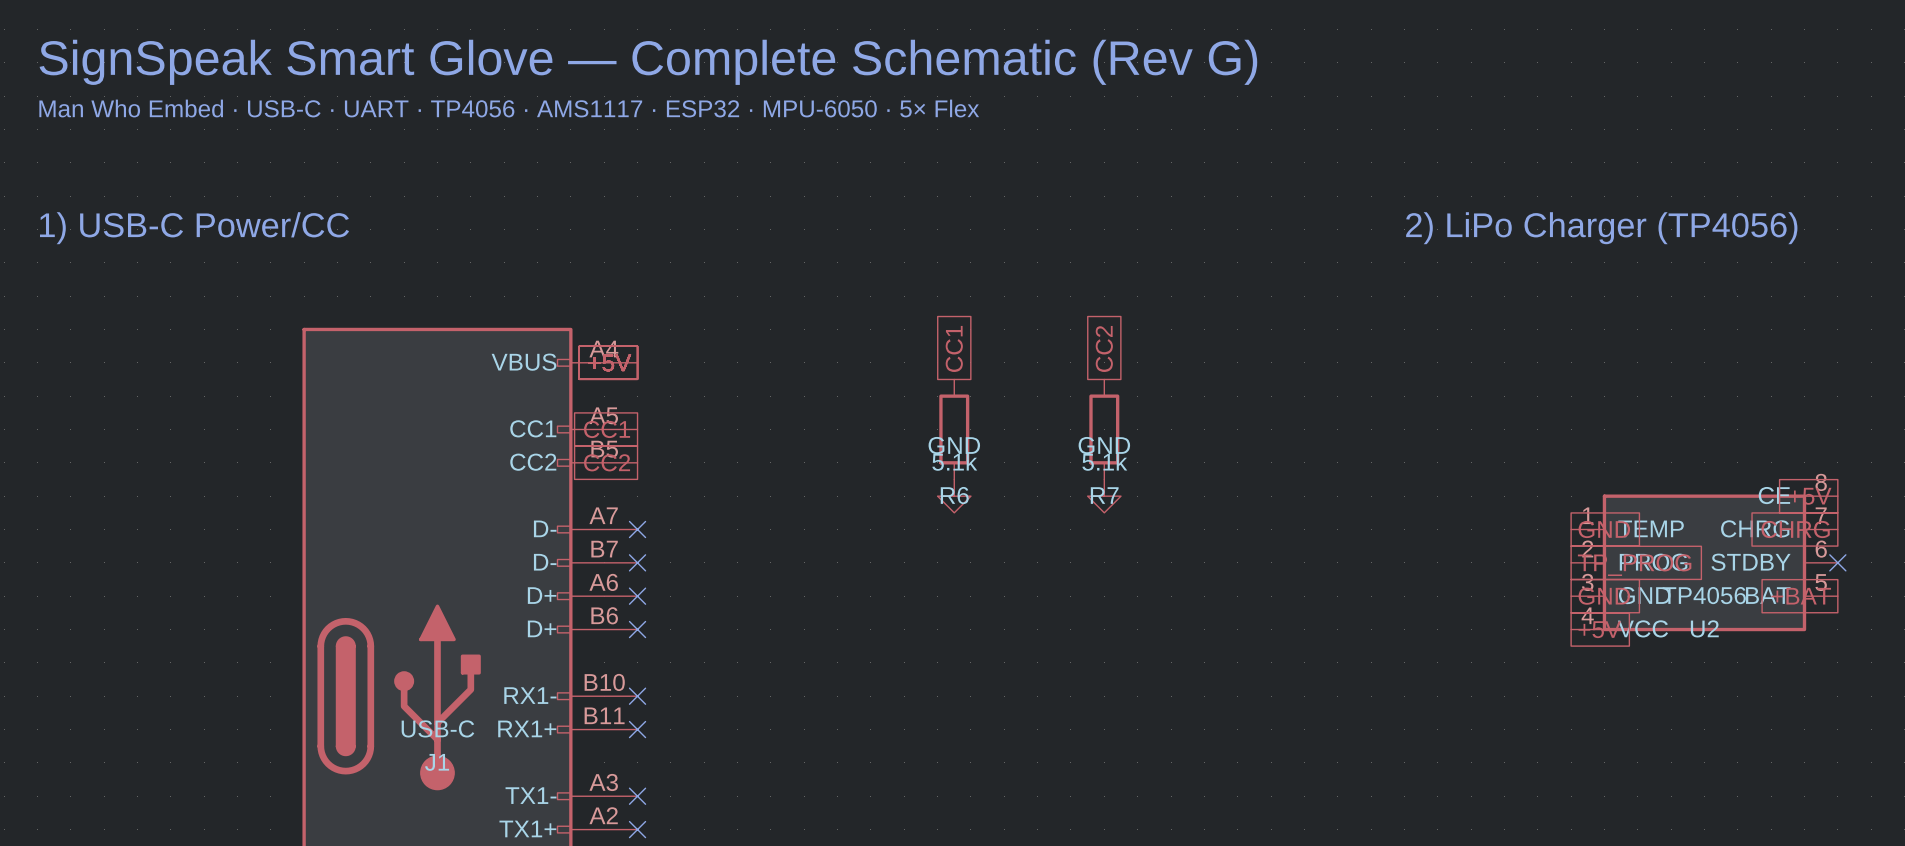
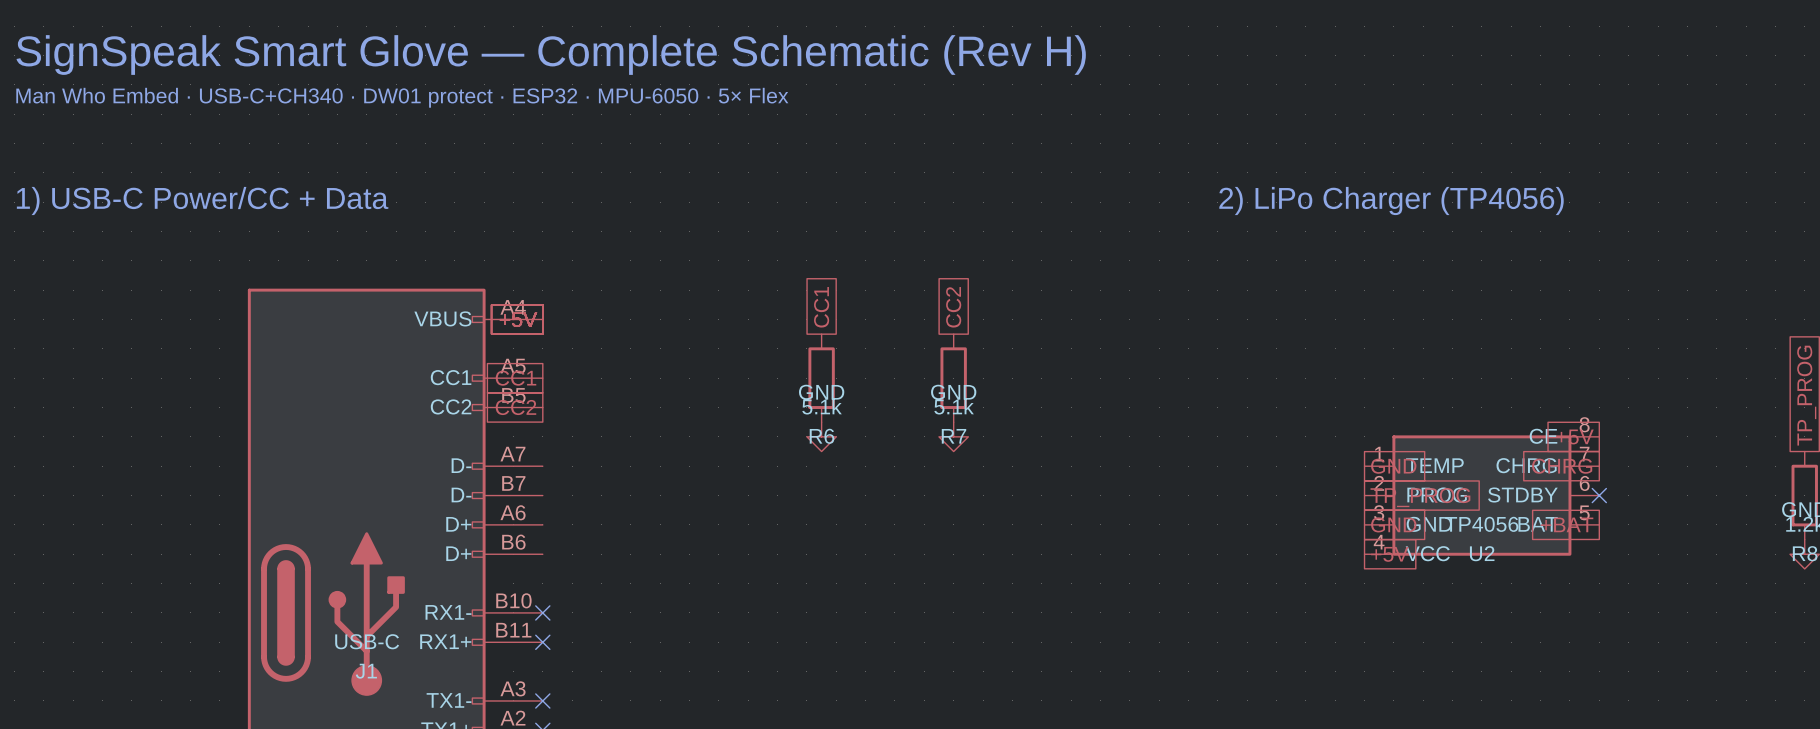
text: SignSpeak Smart Glove — Complete Schematic (Rev G) (648, 62) -> SignSpeak Smart Glove — Complete Schematic (Rev H) (551, 55)
text: Man Who Embed · USB-C · UART · TP4056 · AMS1117 · ESP32 · MPU-6050 · 5× Flex (509, 108) -> Man Who Embed · USB-C+CH340 · DW01 protect · ESP32 · MPU-6050 · 5× Flex (402, 97)
text: 1) USB-C Power/CC (194, 228) -> 1) USB-C Power/CC + Data (202, 200)
no-connect mark: (637, 529) -> none
no-connect mark: (637, 562) -> none
no-connect mark: (637, 596) -> none
no-connect mark: (637, 629) -> none

